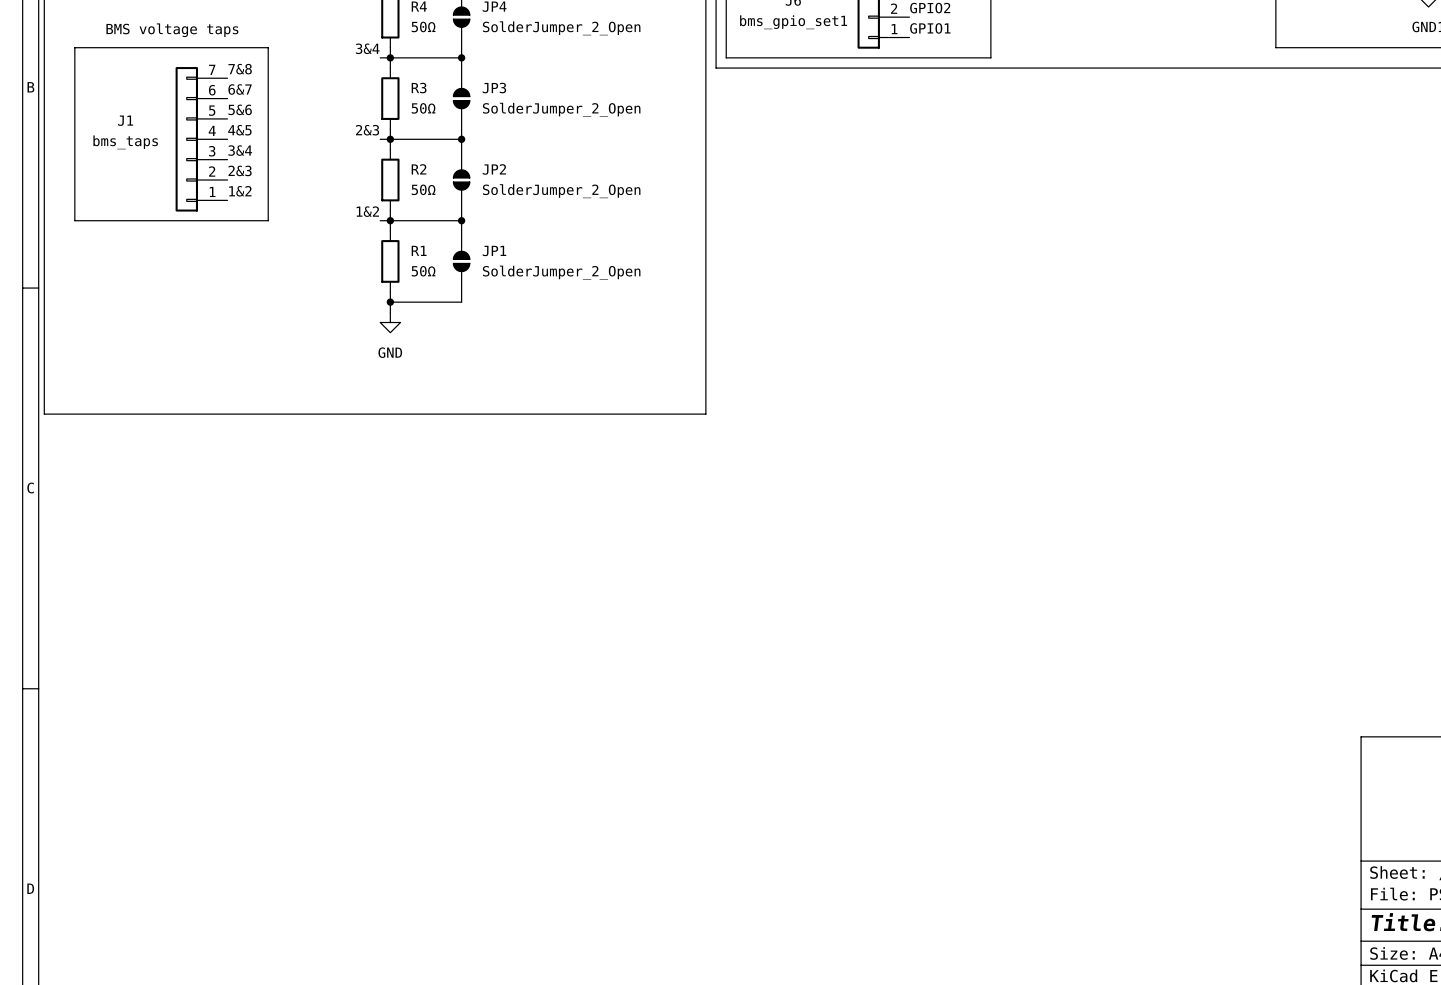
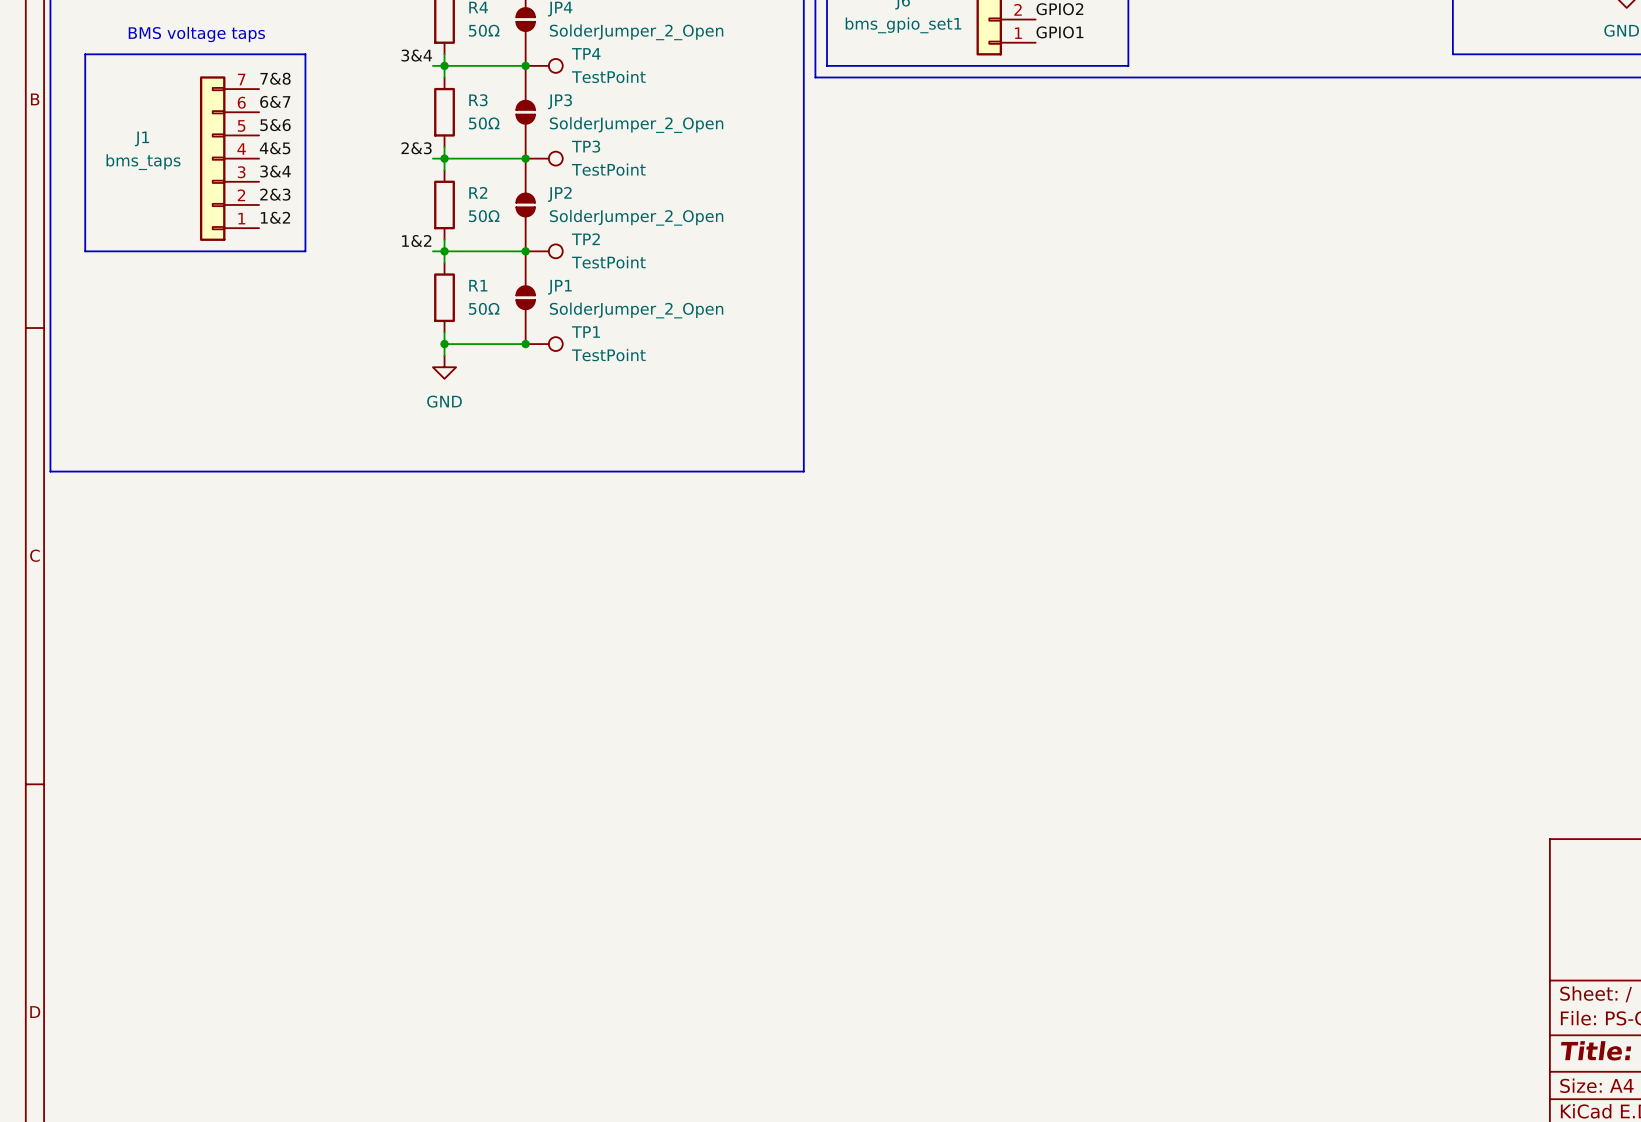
TP4: none -> TestPoint (544, 65)
TP3: none -> TestPoint (544, 158)
TP2: none -> TestPoint (544, 251)
junction: none -> (525, 344)
TP1: none -> TestPoint (544, 344)

